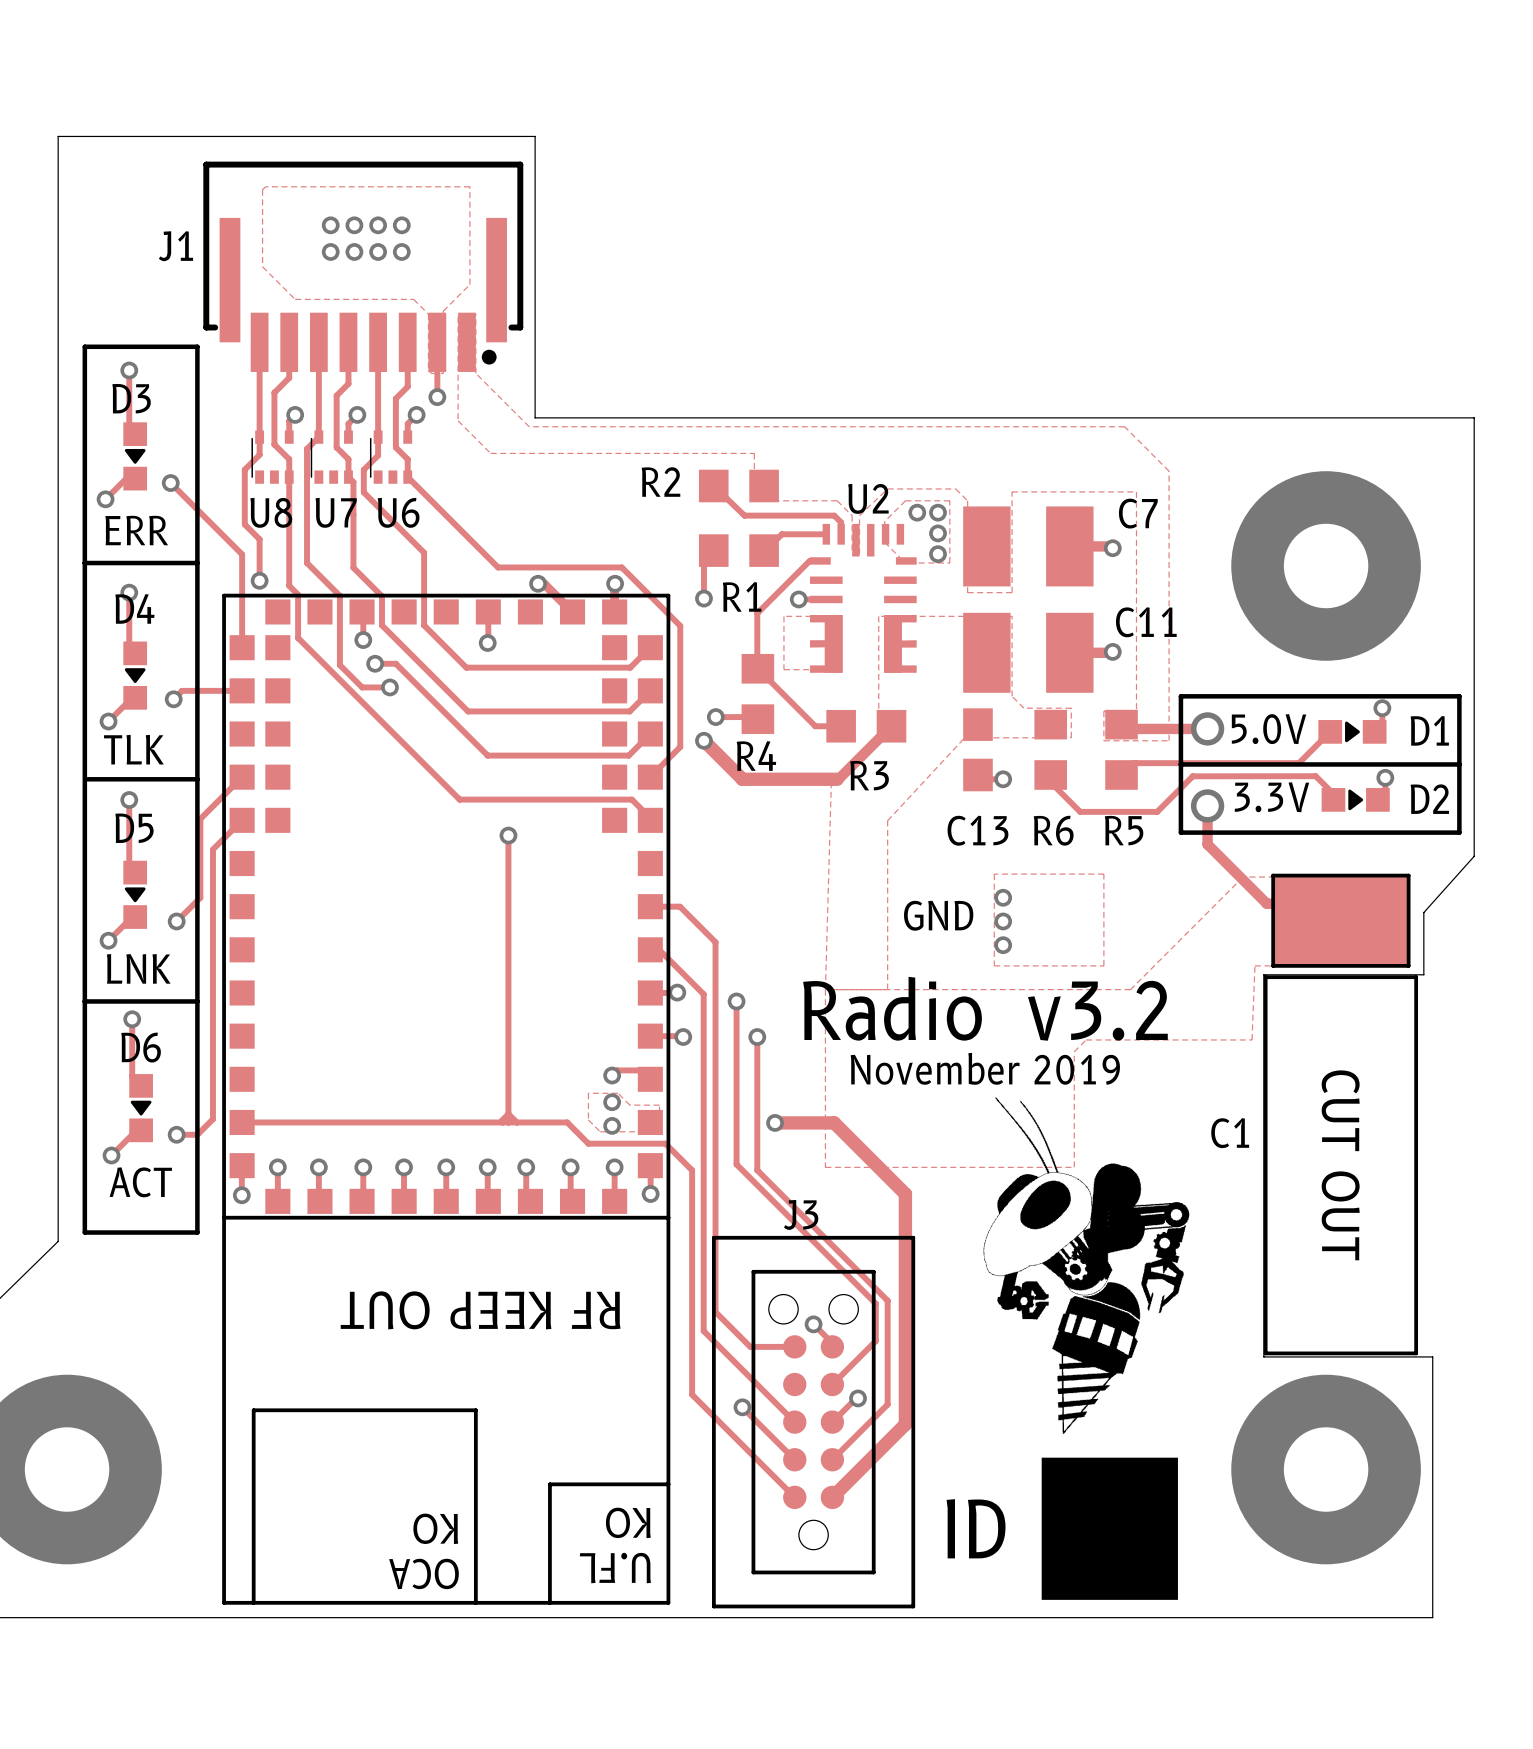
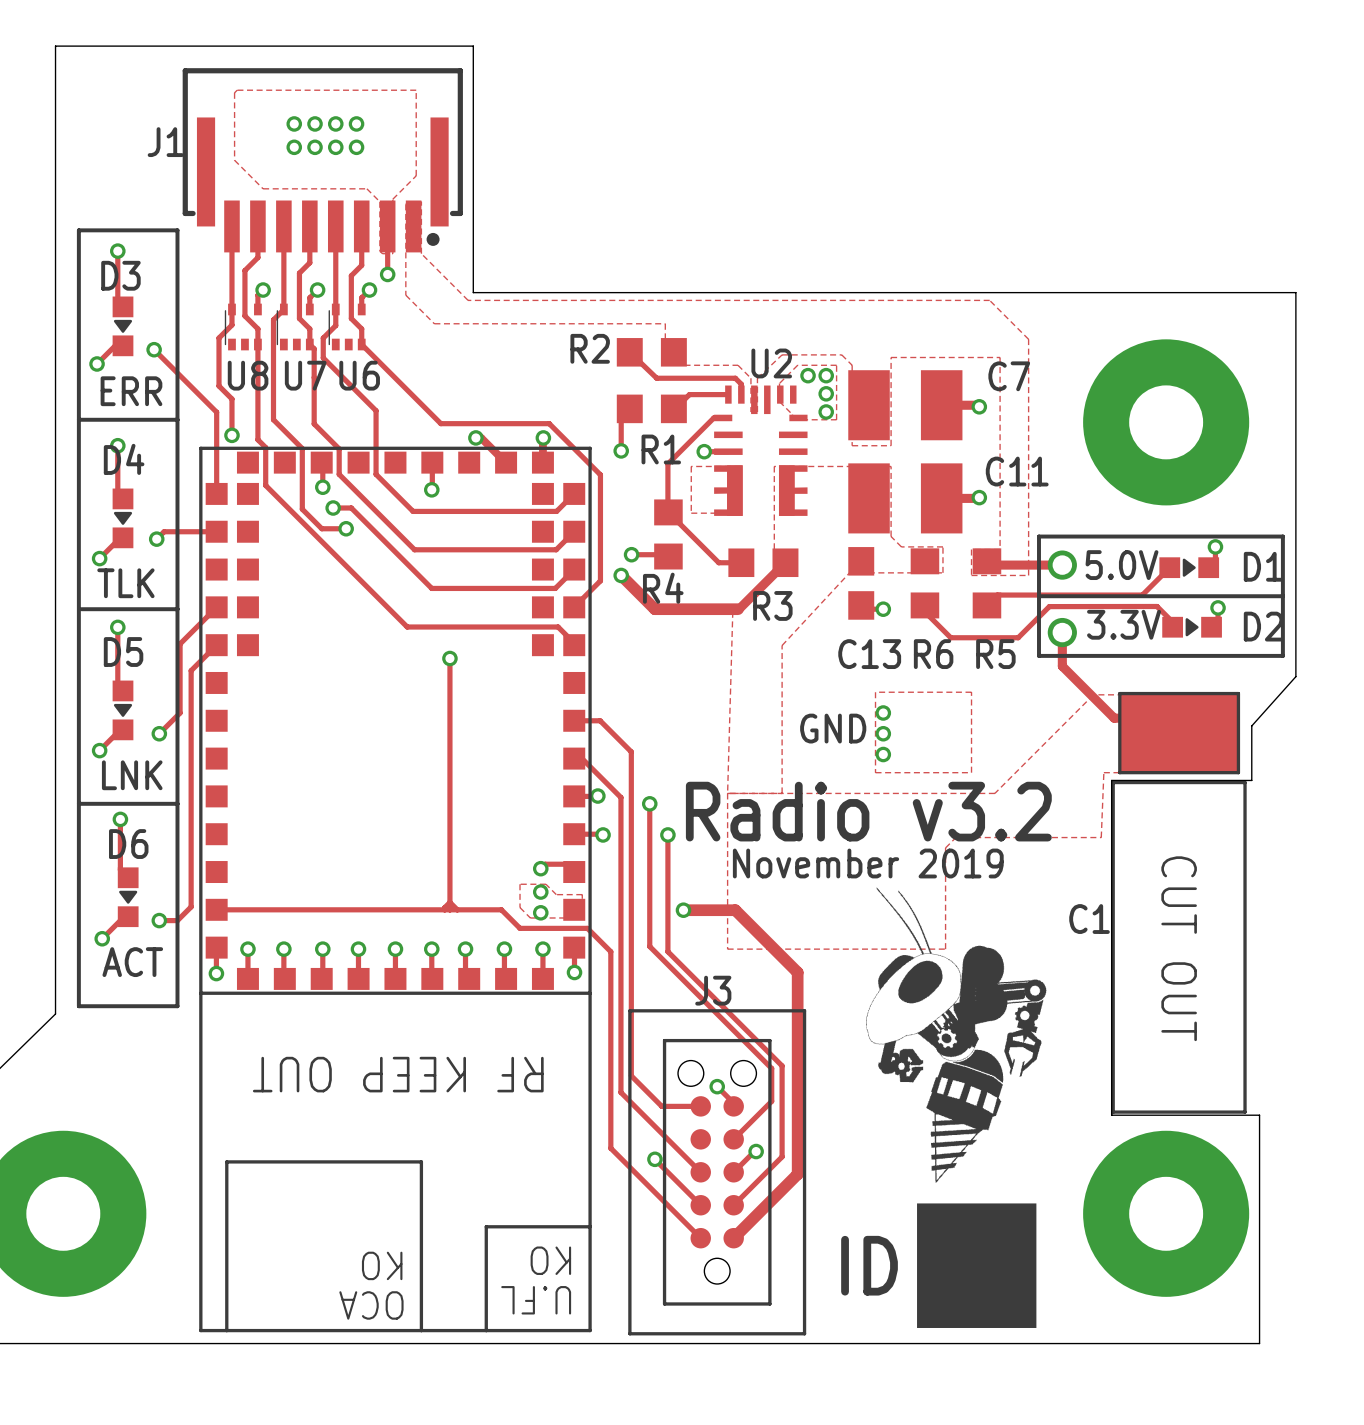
text: Radio (892, 1008) -> Radio v3.2 (868, 811)
text: v3.2 (1097, 1010) -> none

